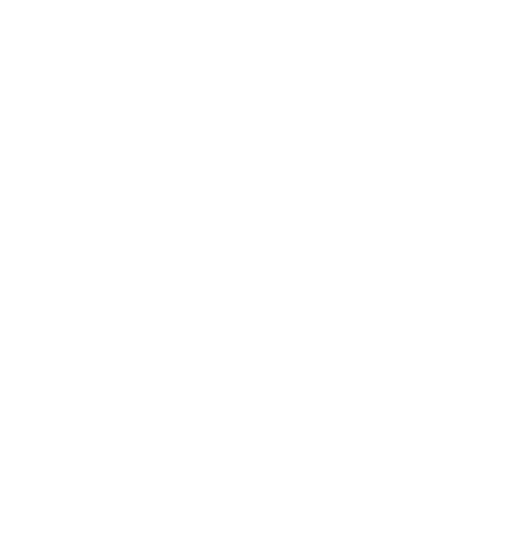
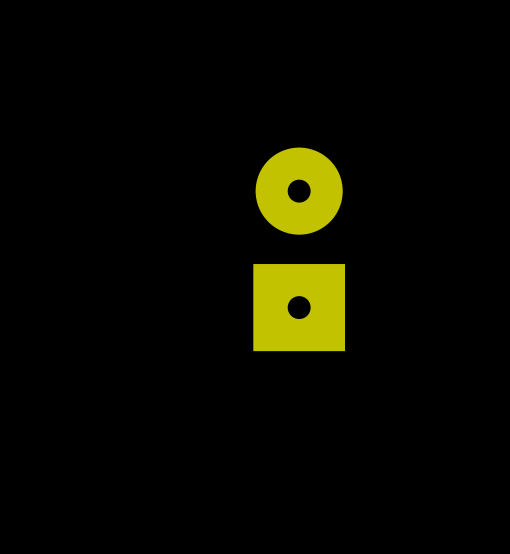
part: none -> (299, 249)

